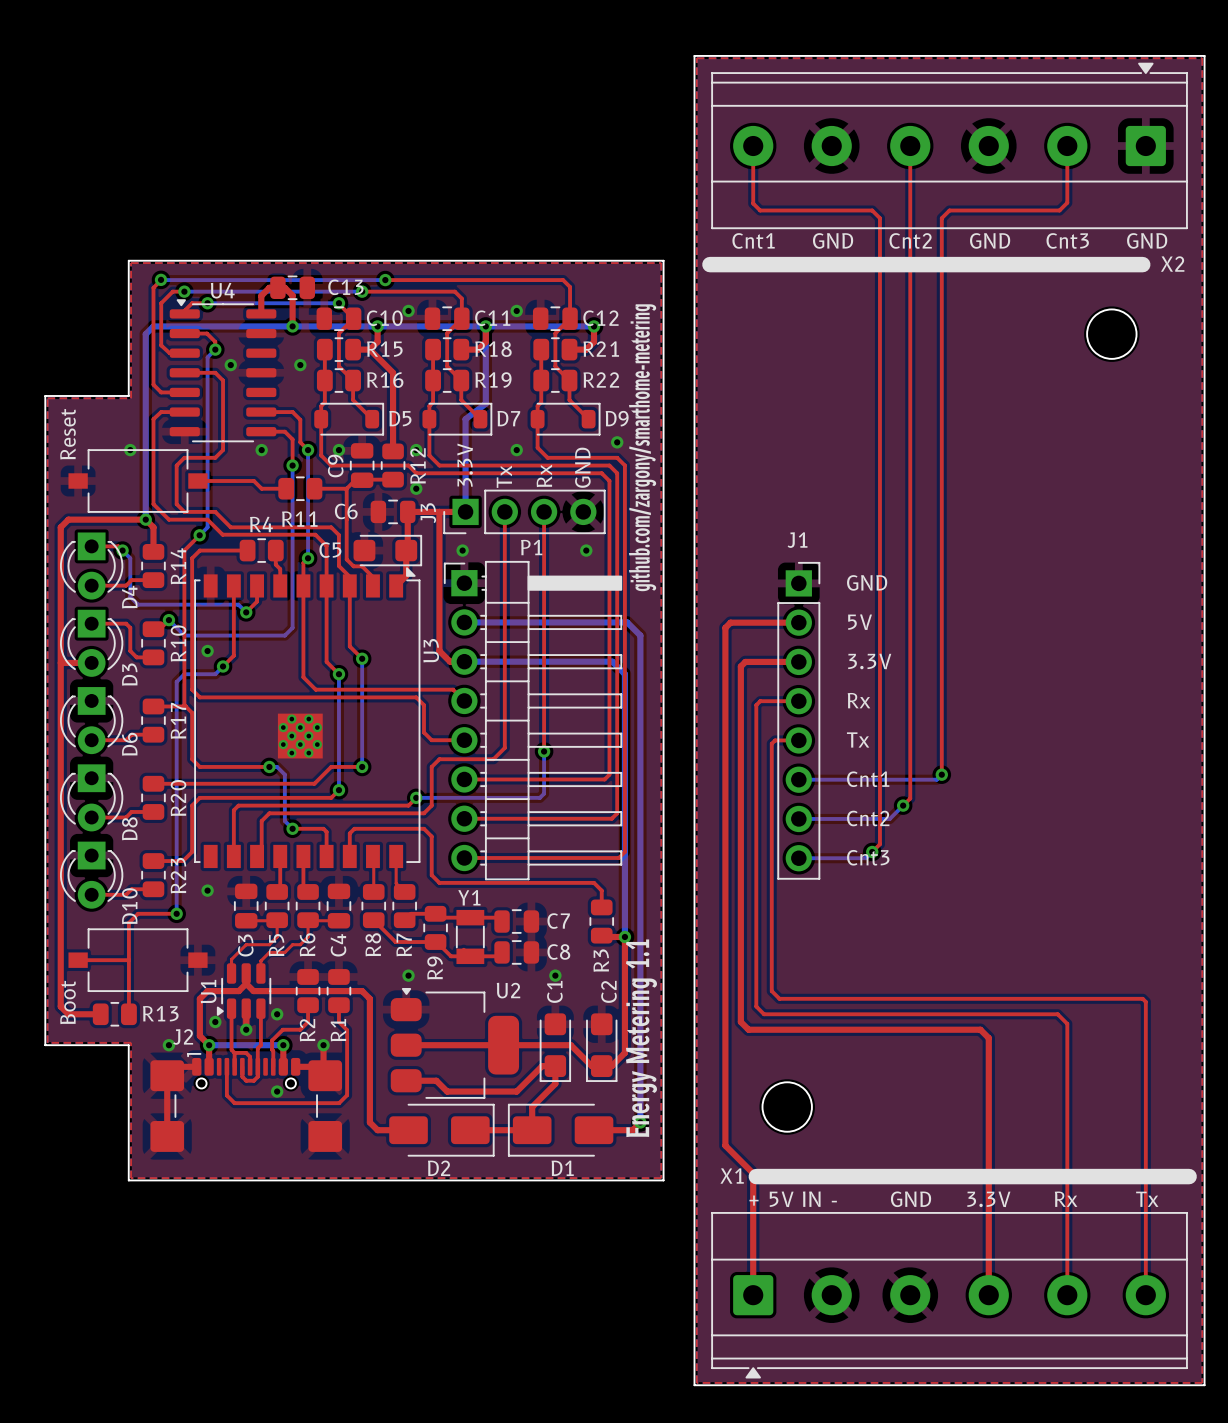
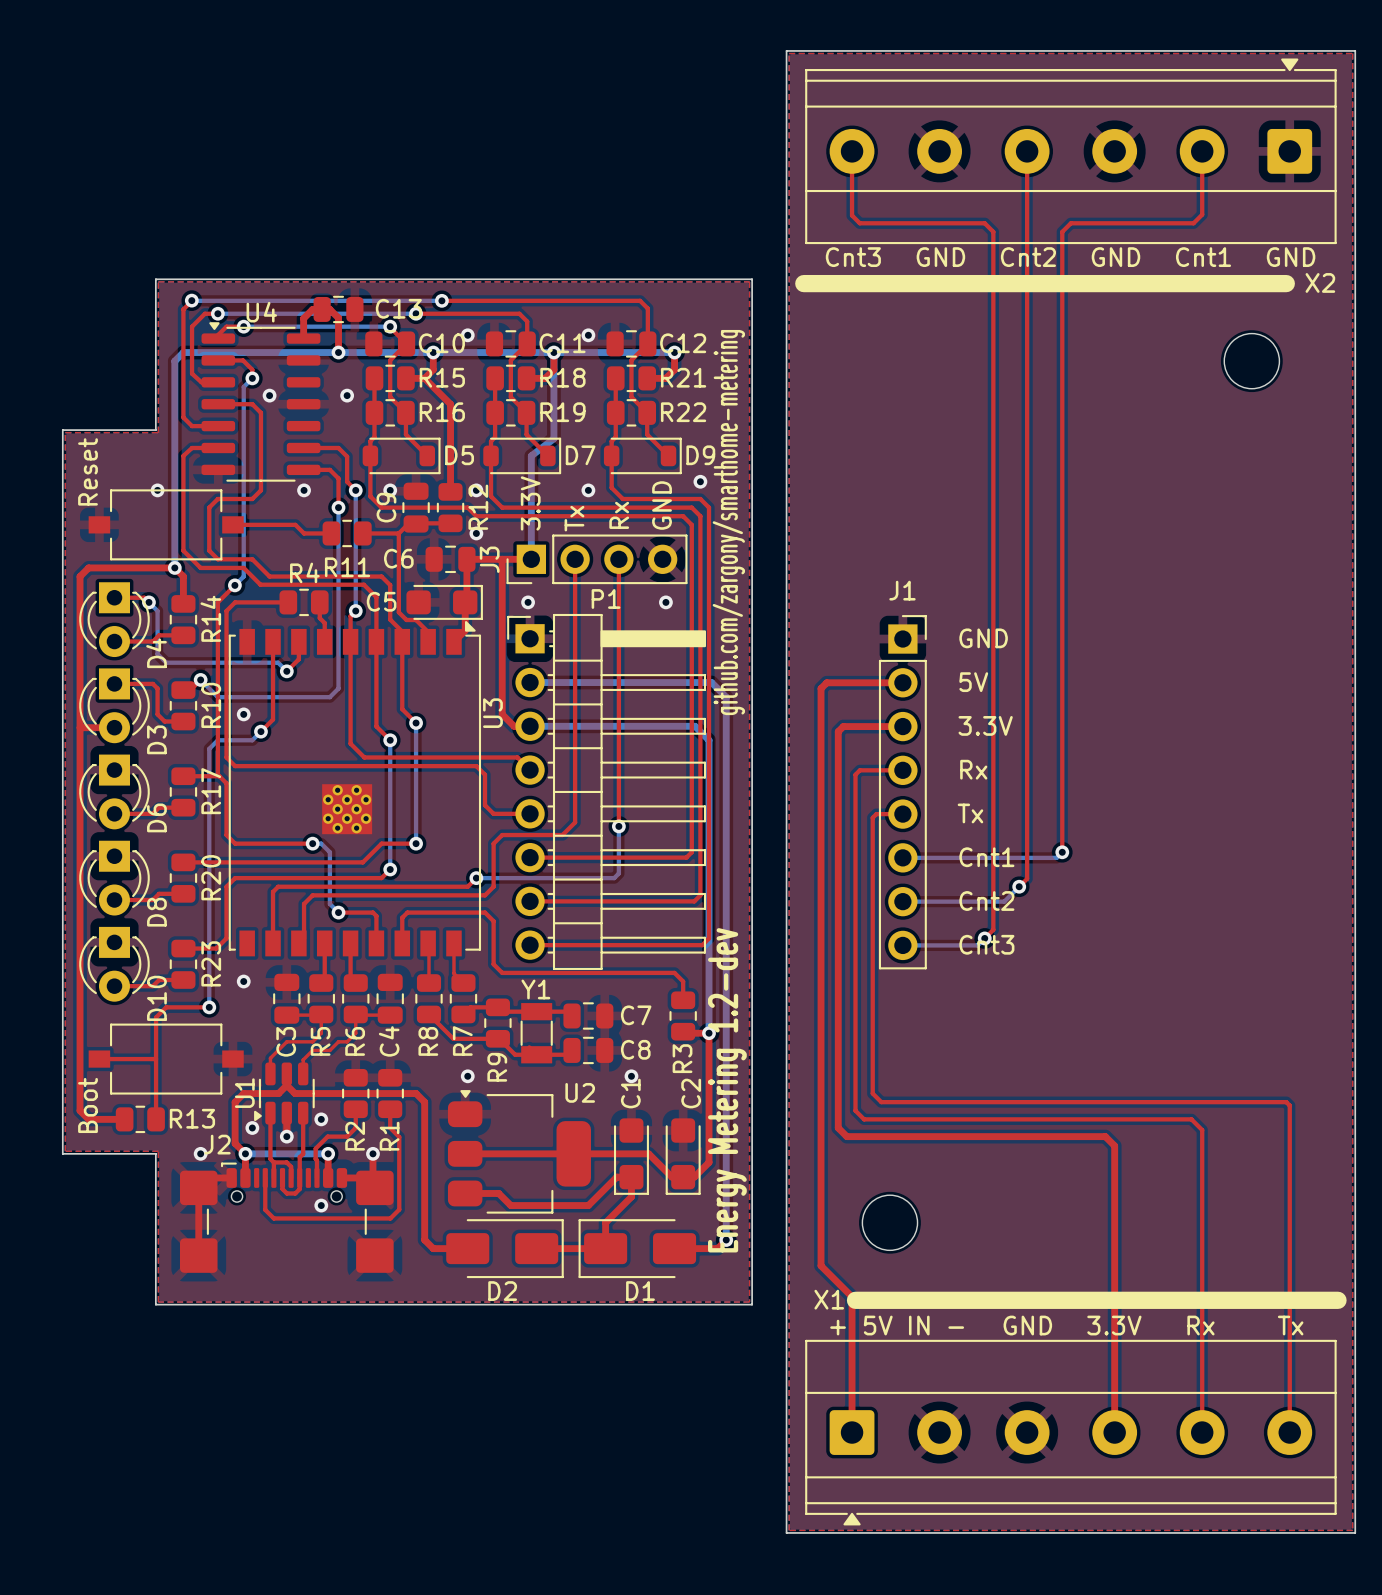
text: Cnt1 (753, 240) -> Cnt3 (853, 257)
text: Cnt3 (1067, 240) -> Cnt1 (1203, 257)
text: Energy Metering 1.1 (641, 1038) -> Energy Metering 1.2-dev (727, 1090)

